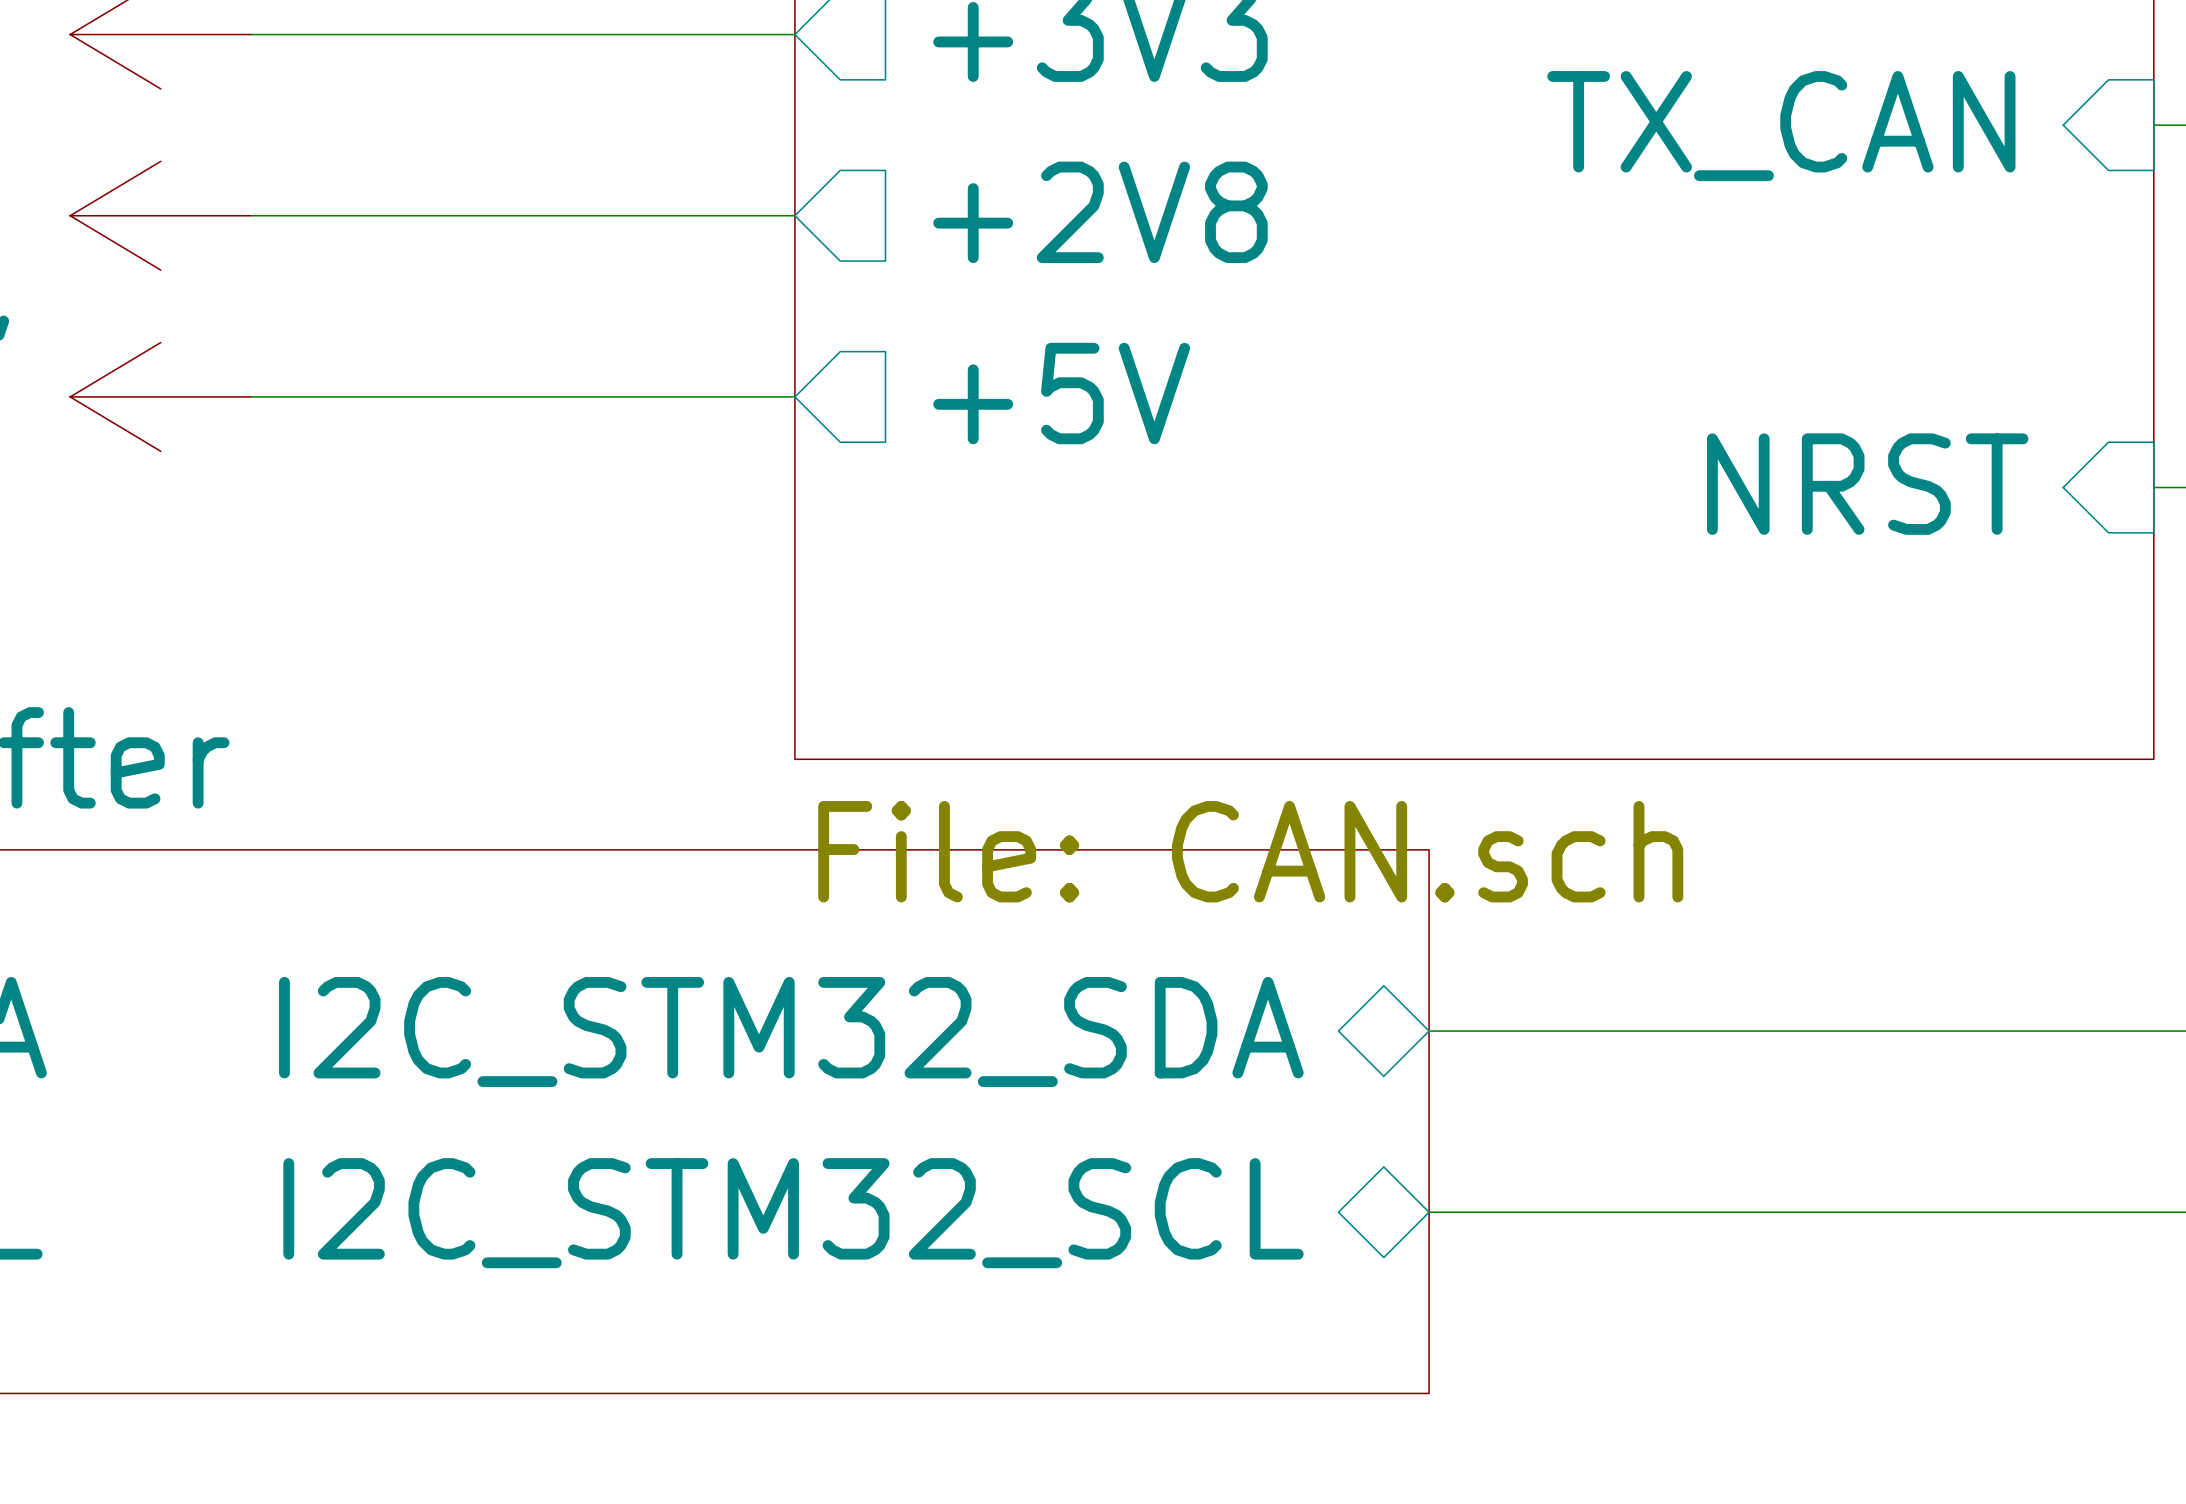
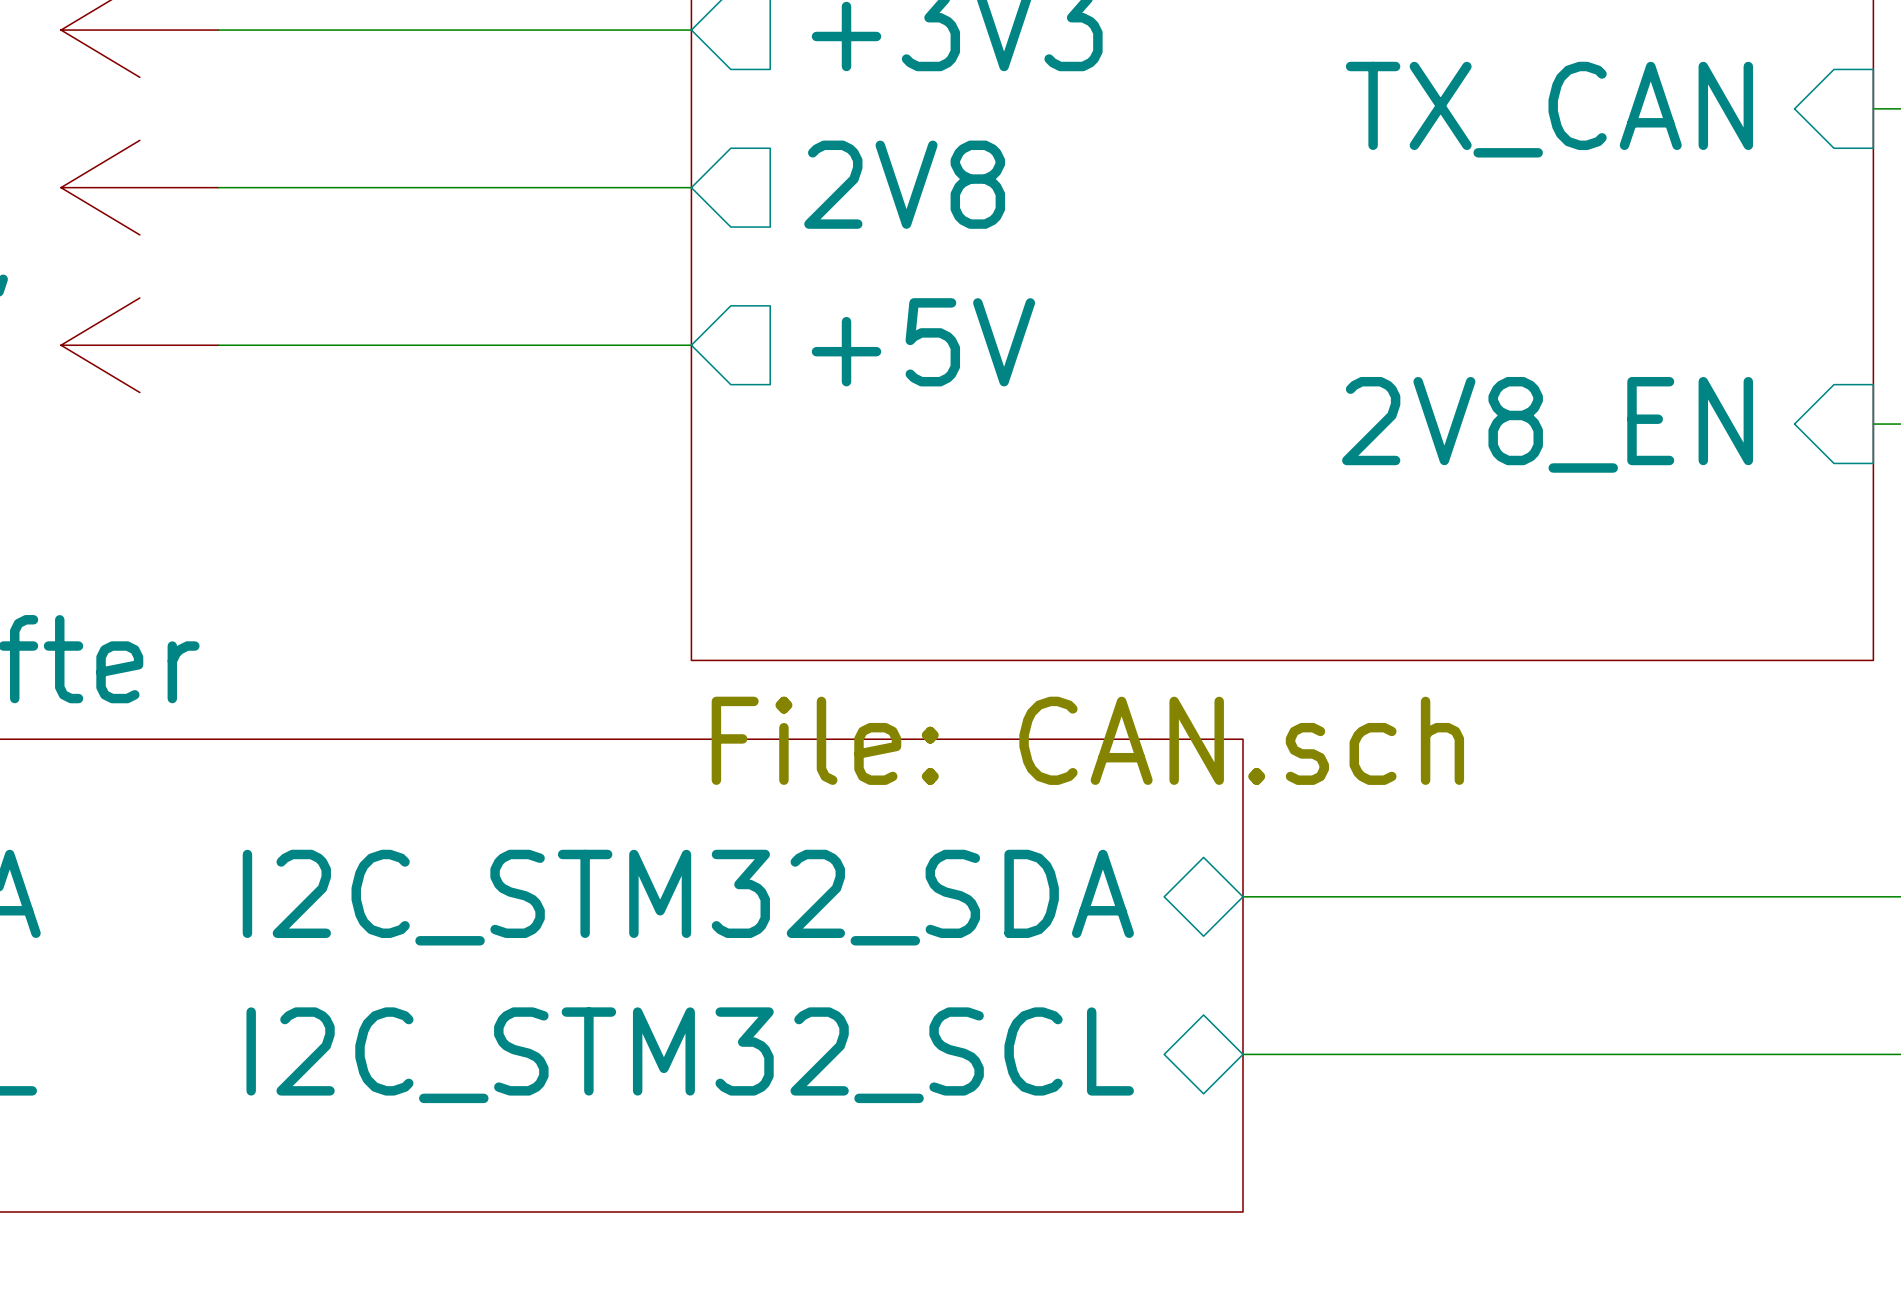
sheet pin: +2V8 (1100, 212) -> 2V8 (904, 184)
sheet pin: NRST (1867, 484) -> 2V8_EN (1547, 424)

